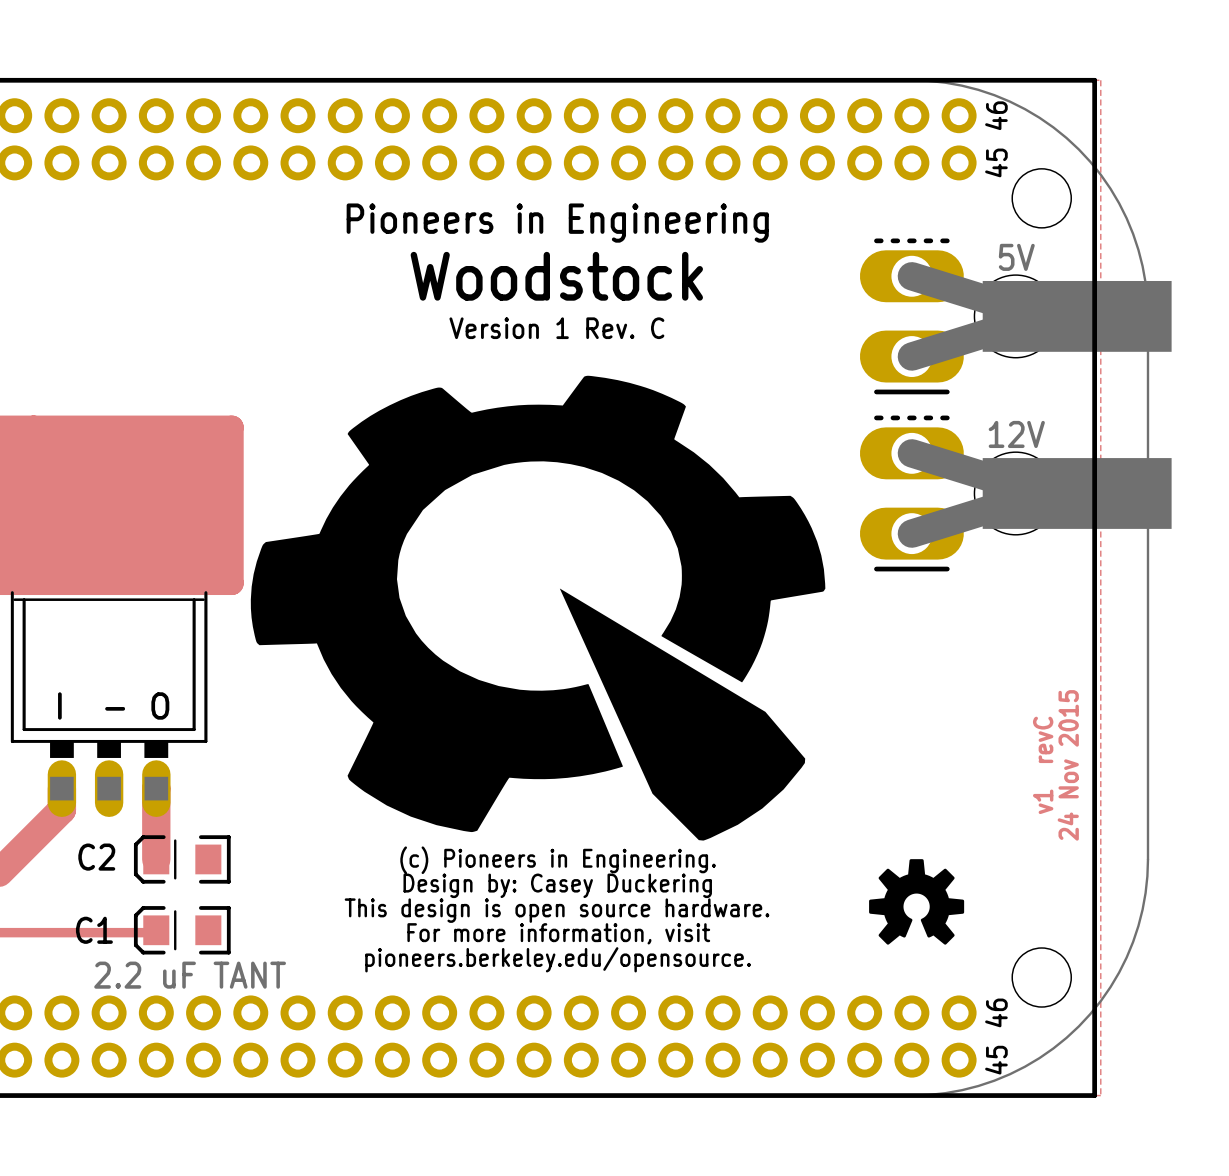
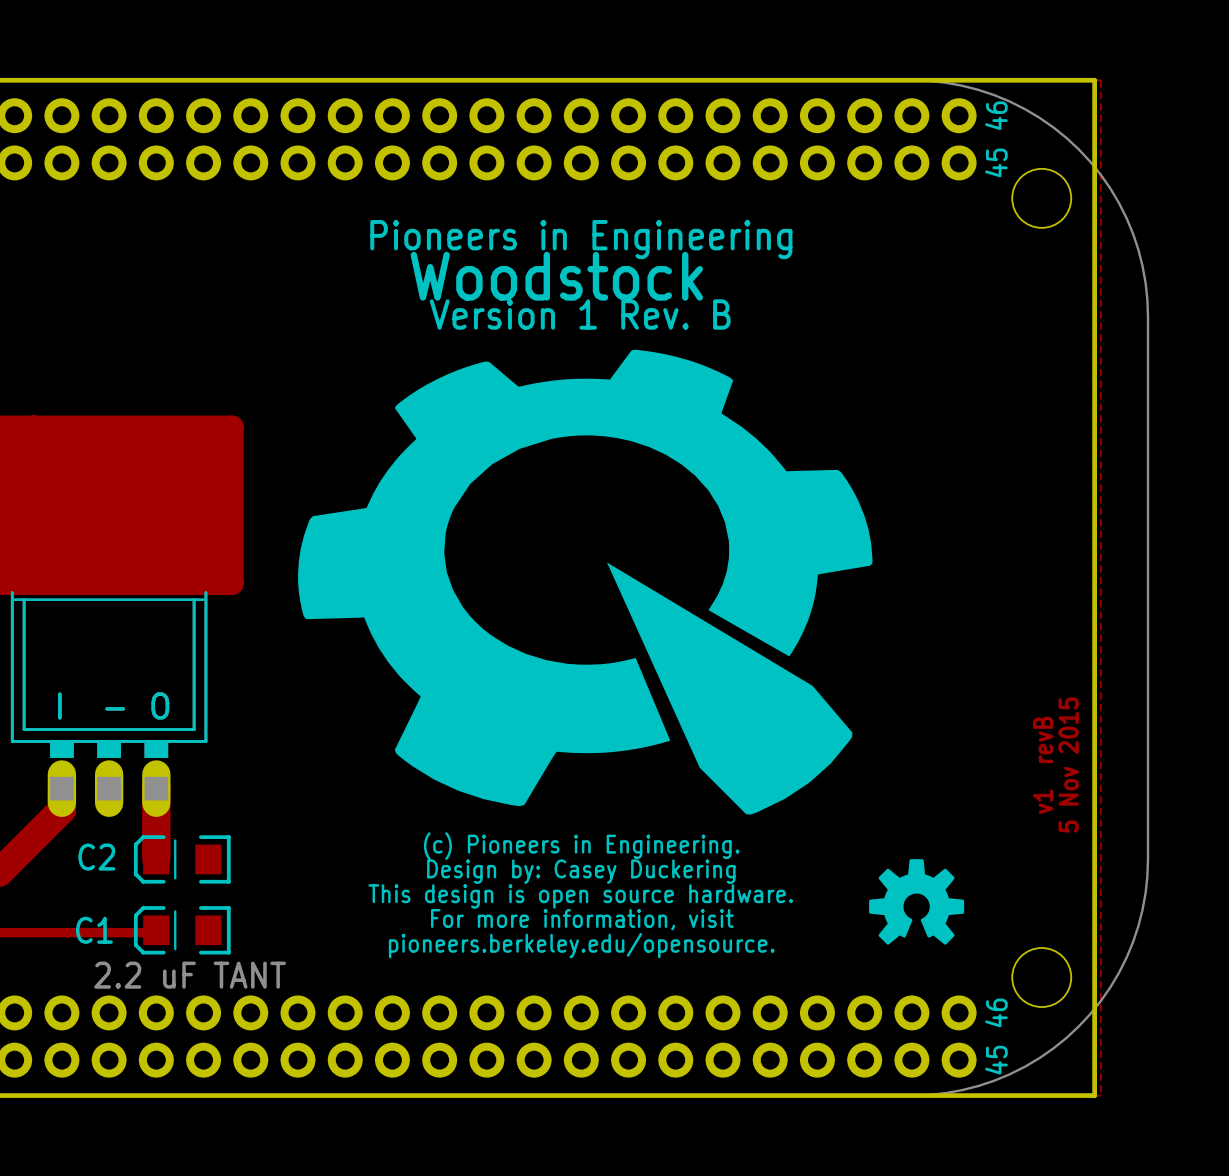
text position: Pioneers in Engineering (557, 223) -> Pioneers in Engineering (581, 239)
part: 5V (1015, 316) -> none
text: Version 1 Rev. C (556, 328) -> Version 1 Rev. B (580, 314)
part: 12V (1015, 493) -> none
drawing position: (538, 608) -> (585, 582)
text: v1 revC (1043, 765) -> v1 revB (1043, 765)
text: 24 Nov 2015 (1068, 765) -> 5 Nov 2015 (1068, 765)
text position: (c) Pioneers in Engineering. (558, 860) -> (c) Pioneers in Engineering. (581, 846)
text position: Design by: Casey Duckering (557, 885) -> Design by: Casey Duckering (581, 871)
text position: This design is open source hardware. (557, 910) -> This design is open source hardware. (580, 896)
text position: For more information, visit (558, 933) -> For more information, visit (582, 919)
text position: pioneers.berkeley.edu/opensource. (558, 959) -> pioneers.berkeley.edu/opensource. (581, 945)

